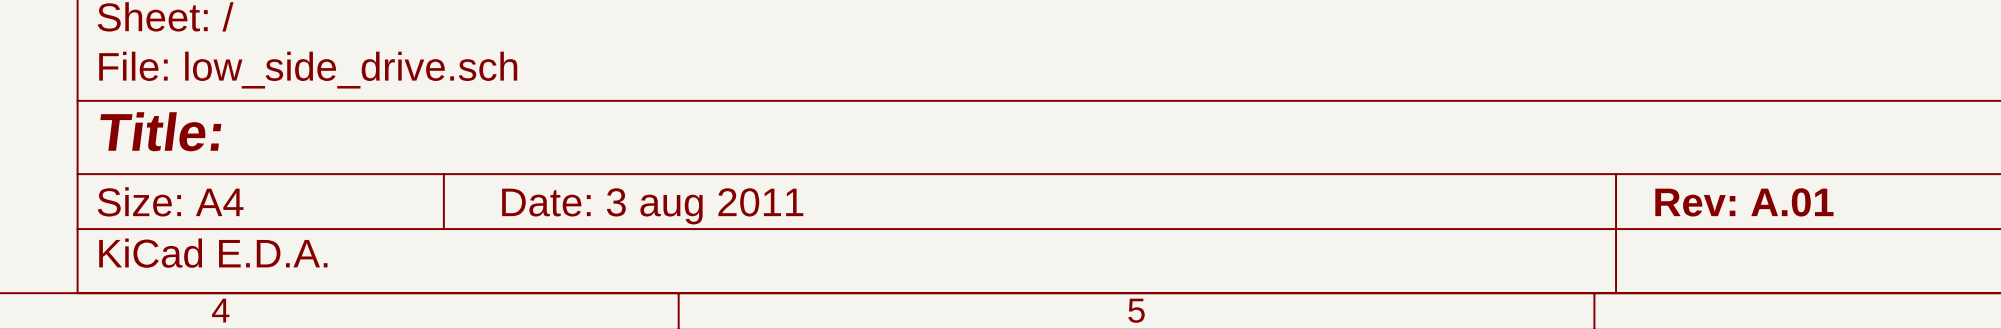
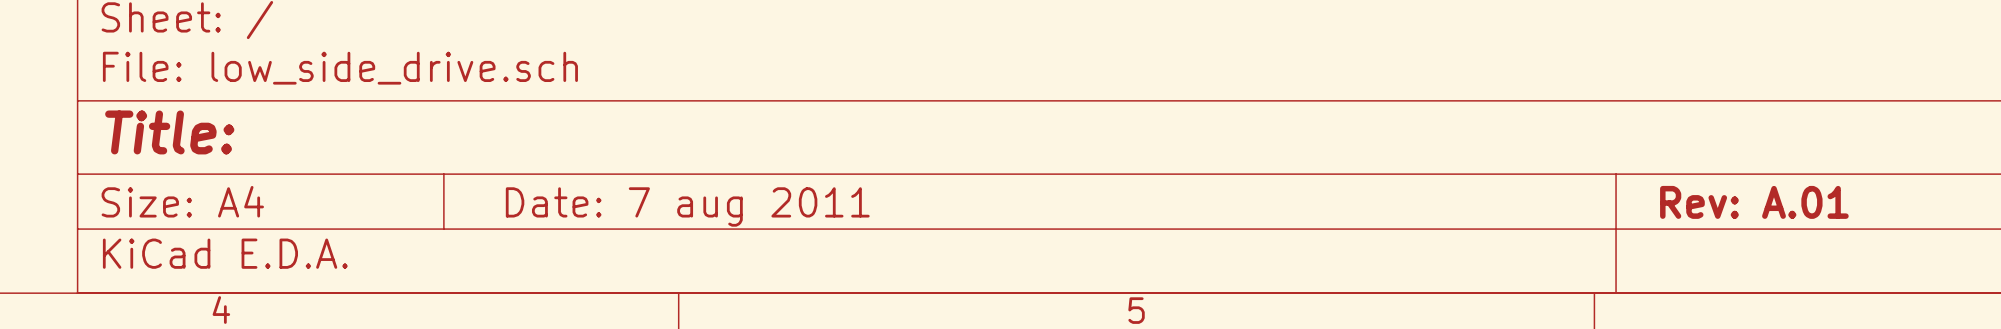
title block: Date: 3 aug 2011 (652, 206) -> Date: 7 aug 2011 (687, 206)

